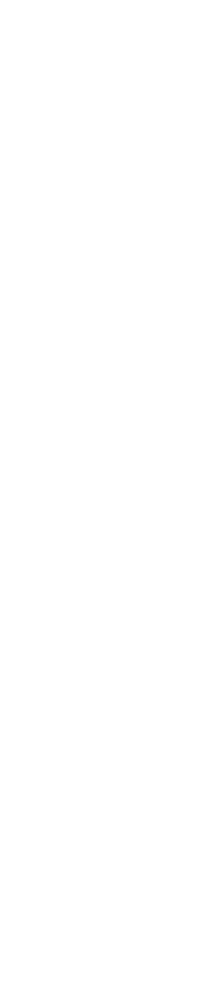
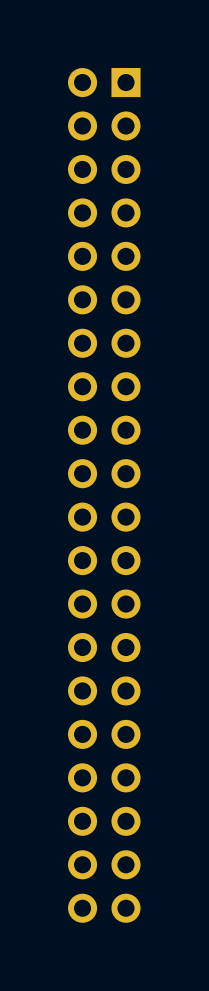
part: none -> (104, 495)

